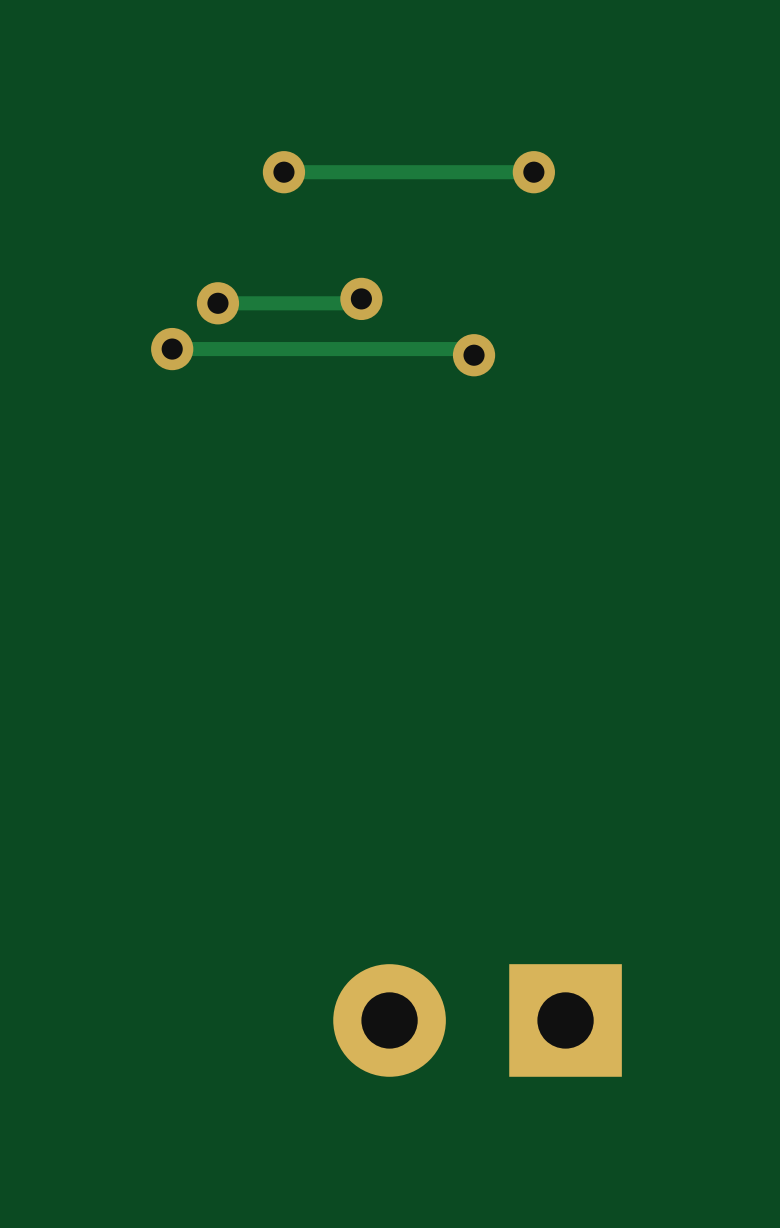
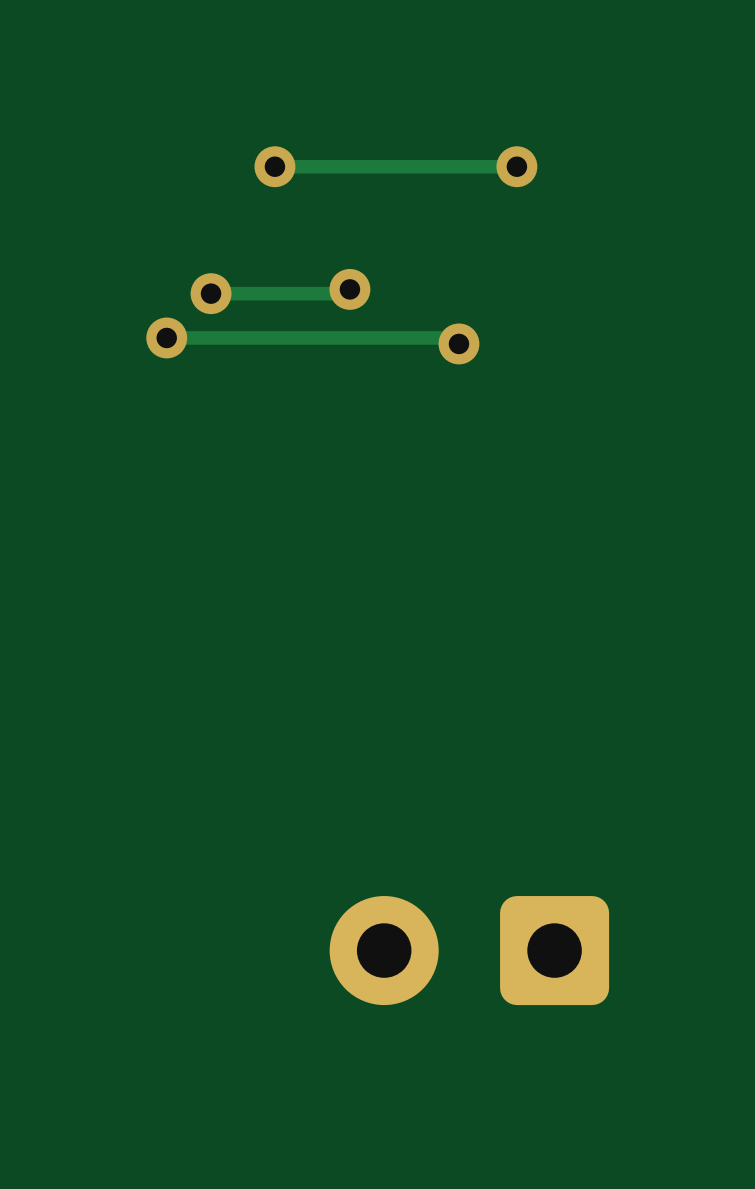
part footprint: [333, 964, 622, 1077] -> [329, 896, 610, 1006]

